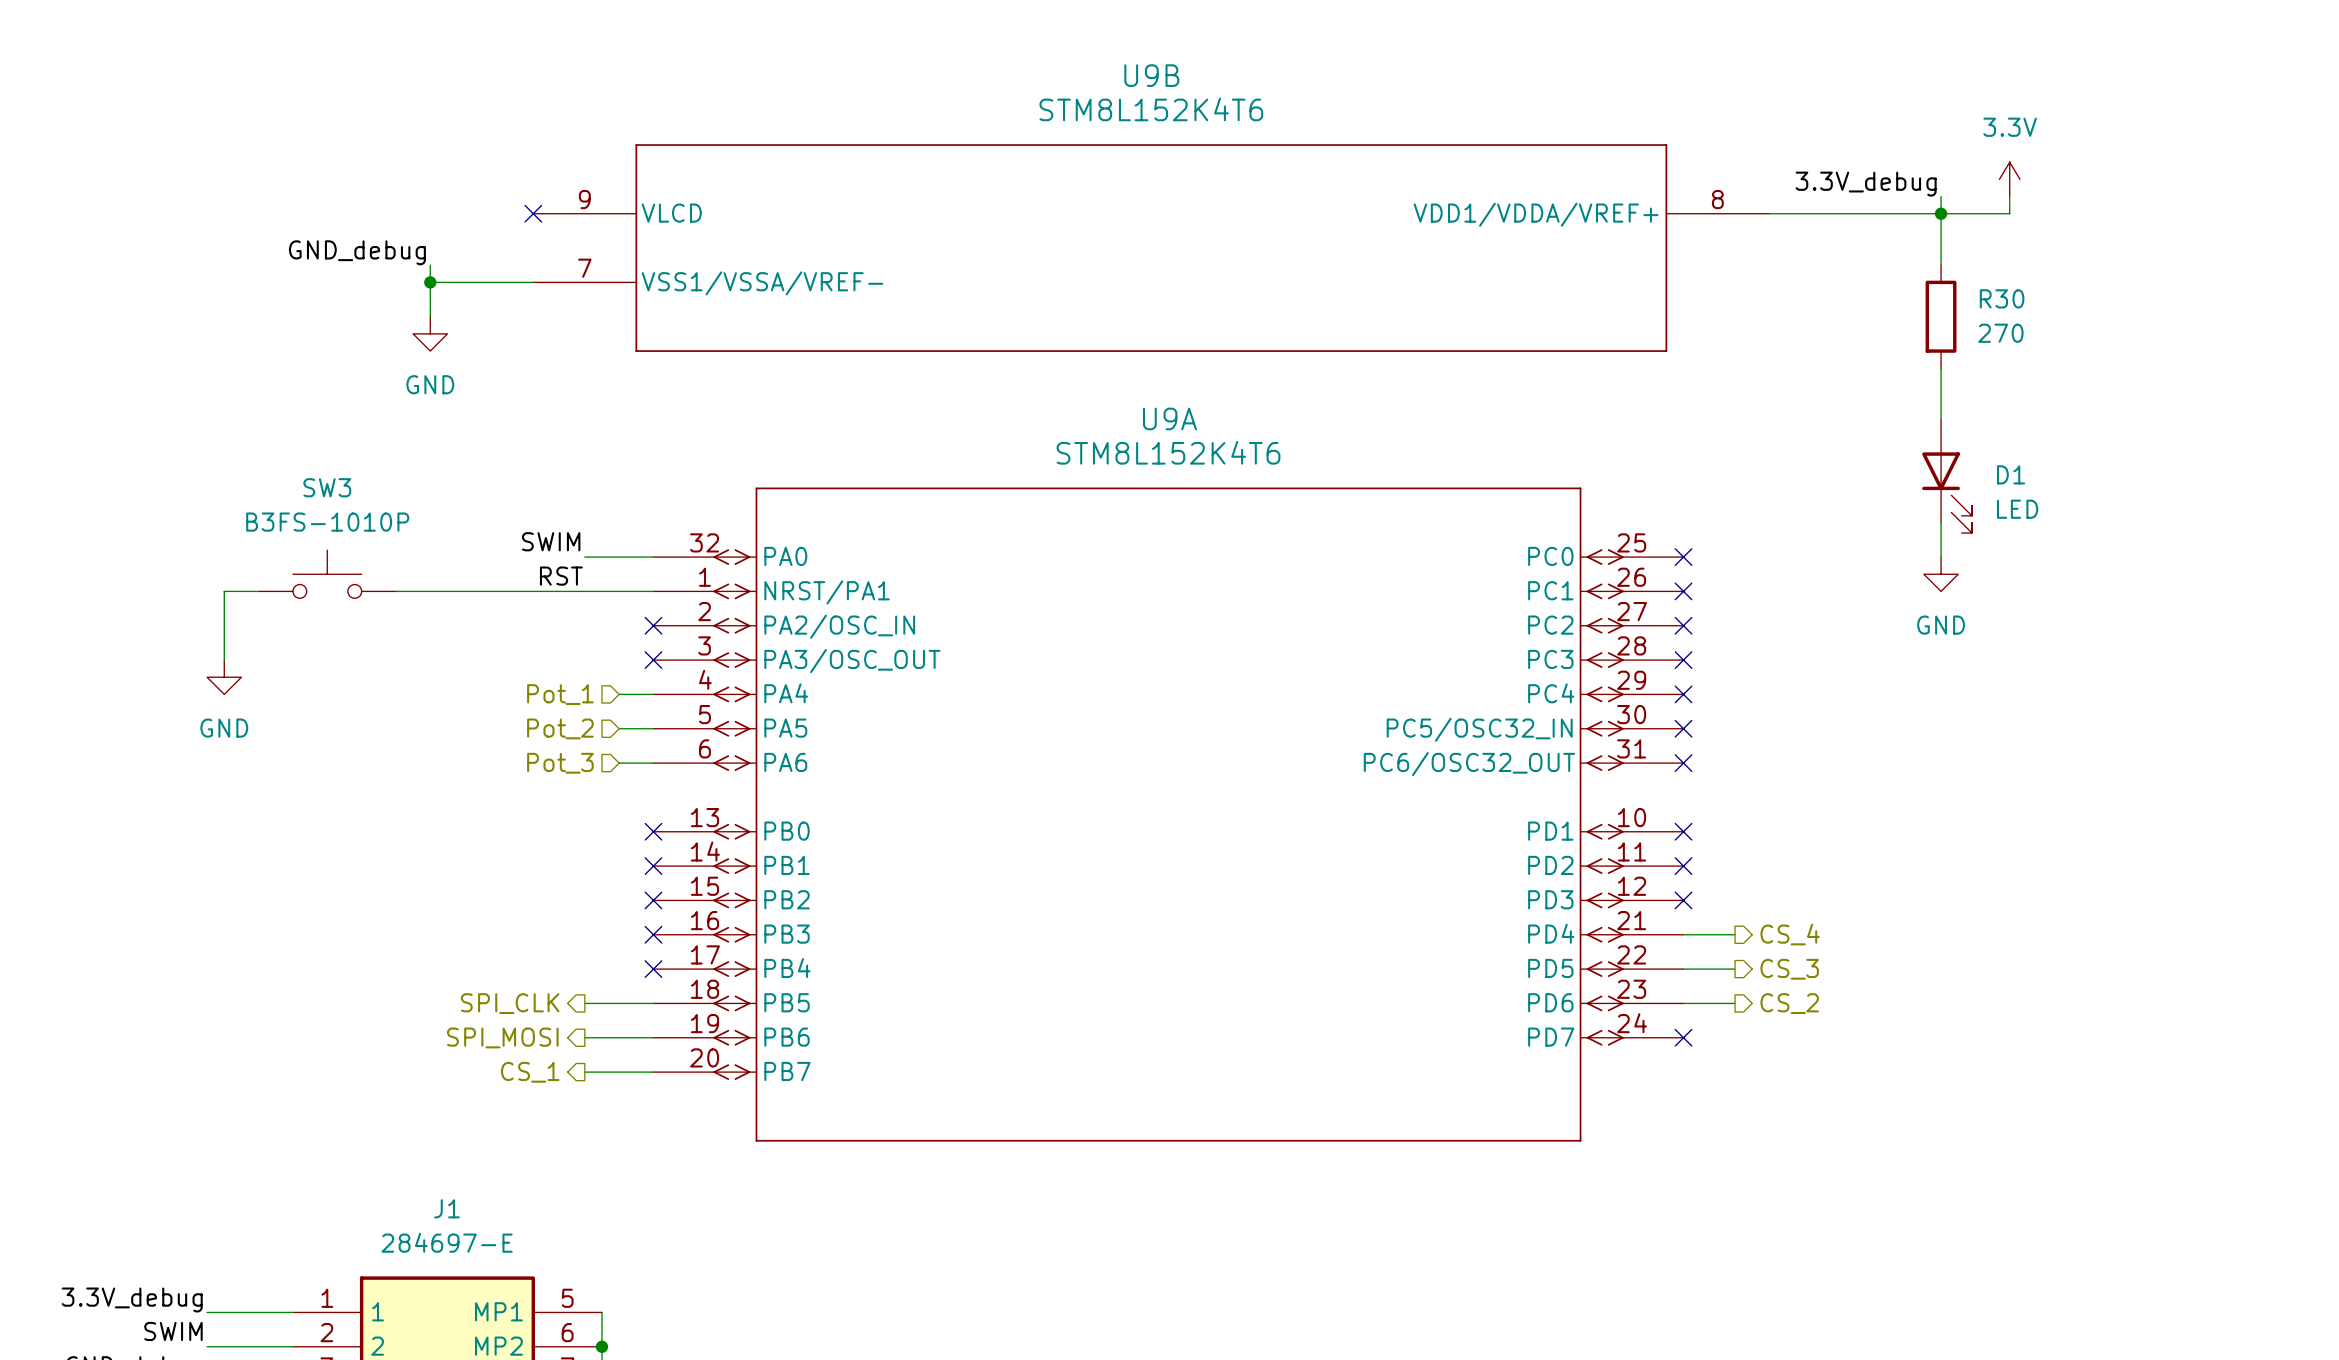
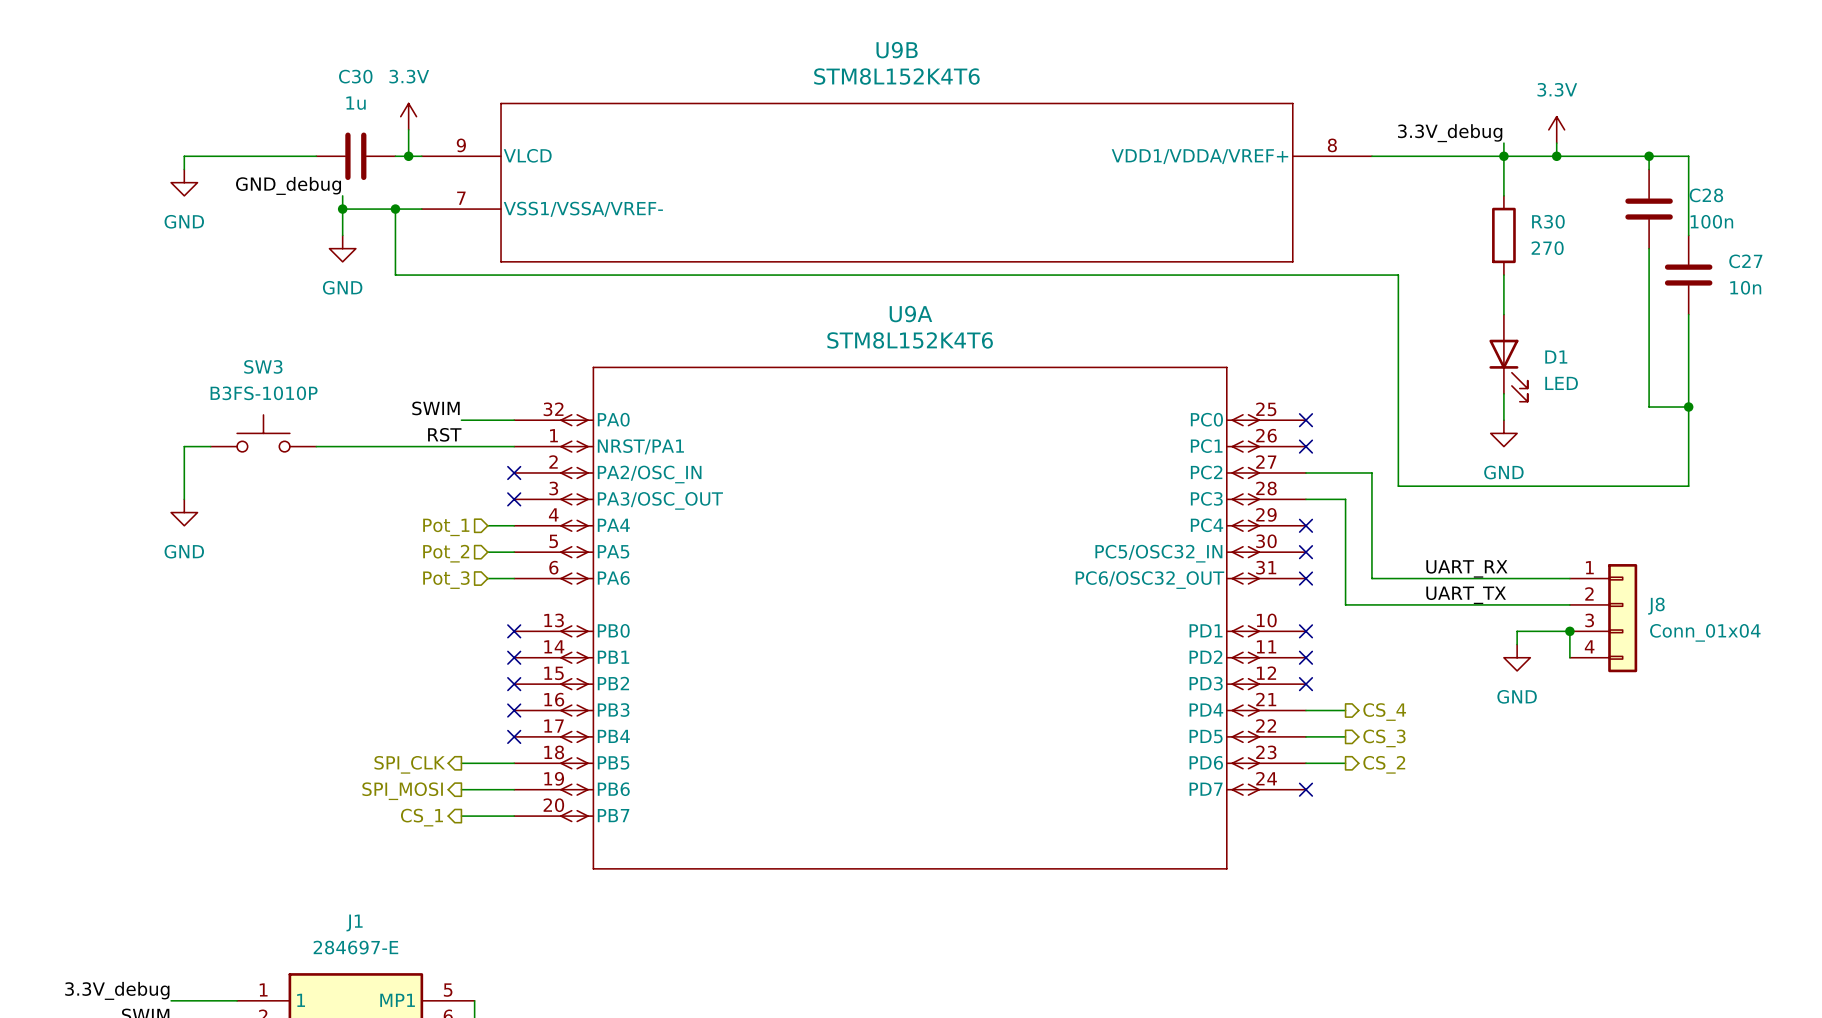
power symbol: none -> 3.3V (408, 116)
wire: none -> (408, 129) (408, 156)
wire: none -> (316, 156) (184, 156) (184, 169)
C30: none -> 1u (355, 156)
wire: none -> (395, 156) (421, 156)
junction: none -> (408, 156)
no-connect mark: (533, 213) -> none
wire: none -> (1556, 156) (1688, 156) (1688, 235)
junction: none -> (1556, 156)
wire: none -> (1649, 156) (1649, 169)
junction: none -> (1649, 156)
power symbol: none -> GND (184, 182)
wire: none -> (395, 209) (395, 275) (1398, 275) (1398, 486) (1688, 486) (1688, 314)
junction: none -> (395, 209)
C28: none -> 100n (1649, 209)
wire: none -> (1649, 248) (1649, 407) (1688, 407)
C27: none -> 10n (1688, 275)
junction: none -> (1688, 407)
wire: none -> (1305, 472) (1371, 472) (1371, 578) (1569, 578)
no-connect mark: (1683, 625) -> none
wire: none -> (1305, 499) (1345, 499) (1345, 604) (1569, 604)
no-connect mark: (1683, 660) -> none
label: none -> UART_RX (1466, 568)
label: none -> UART_TX (1466, 595)
J8: none -> Conn_01x04 (1603, 618)
junction: none -> (1569, 631)
wire: none -> (1517, 644) (1517, 631) (1569, 631) (1569, 657)
power symbol: none -> GND (1517, 657)

